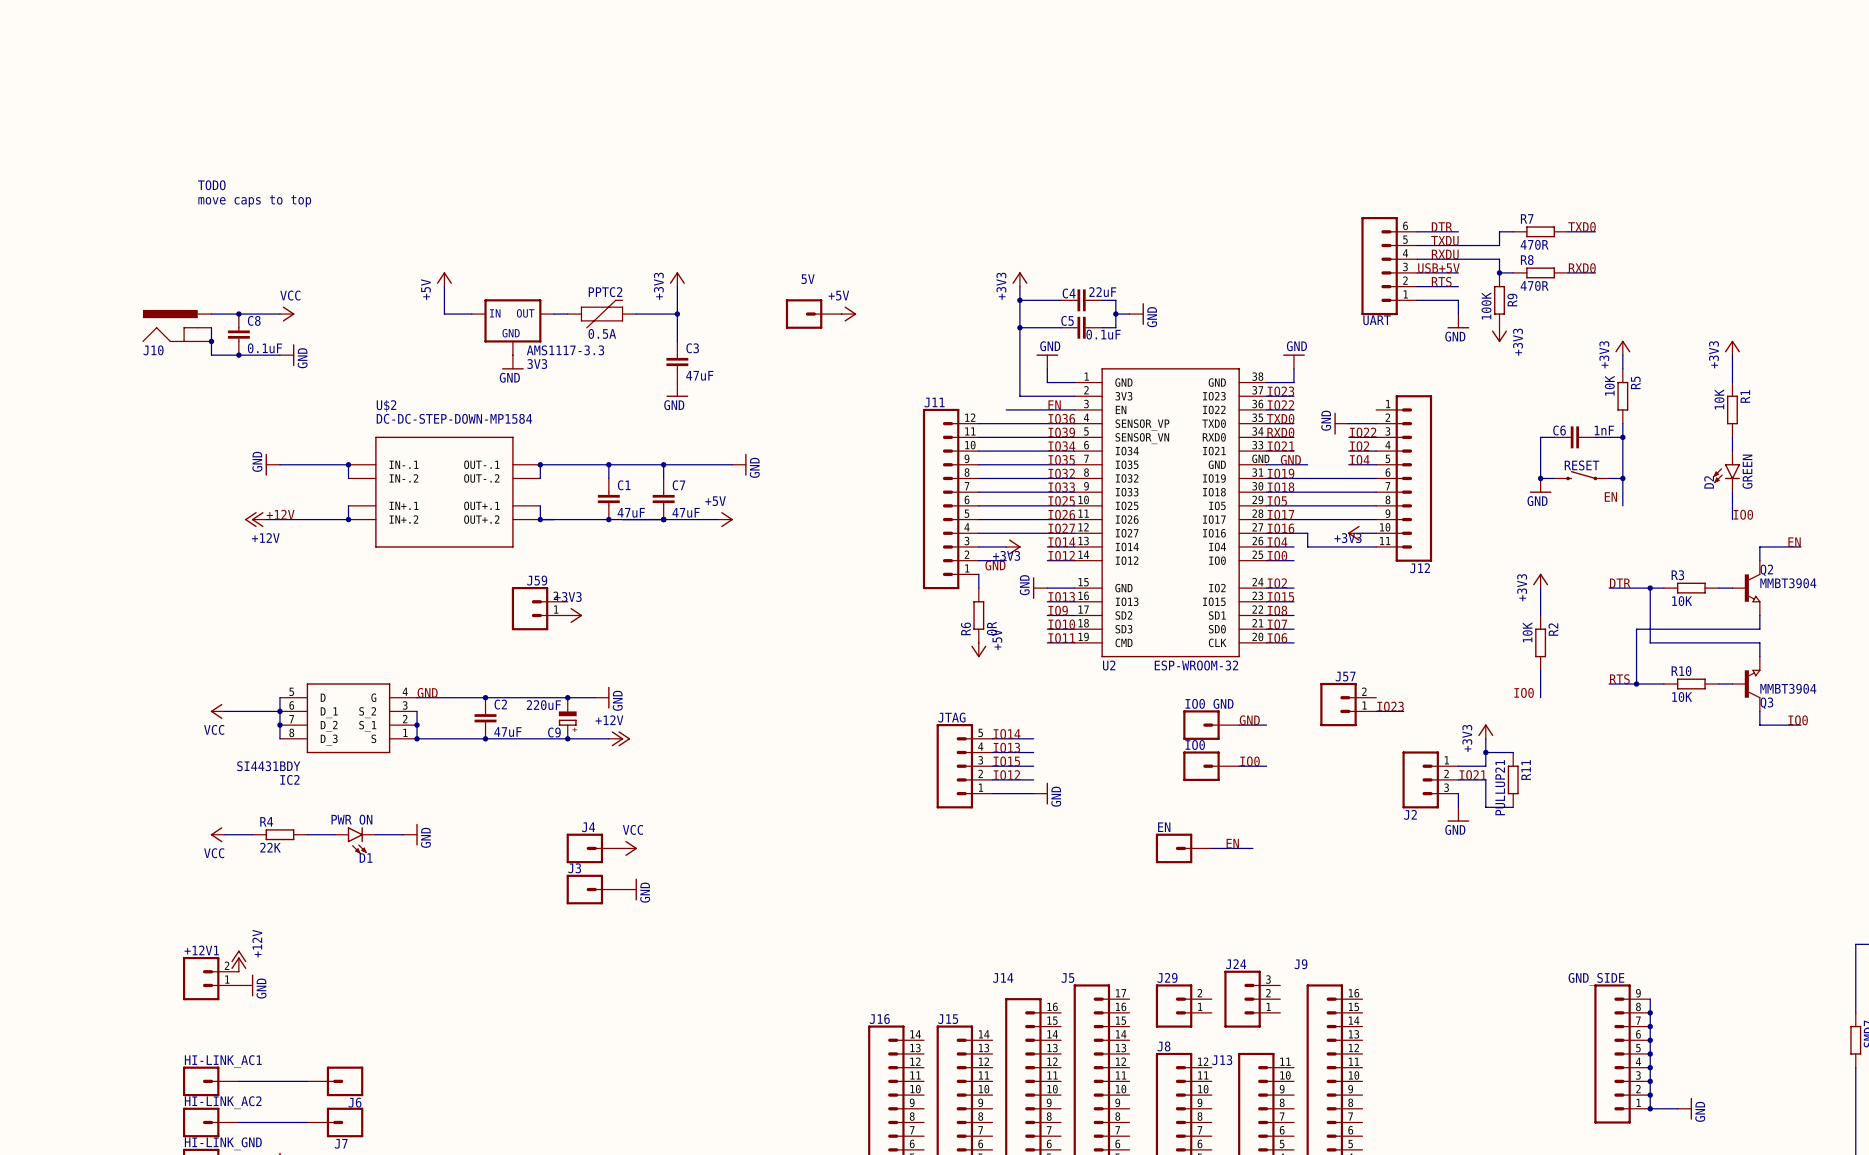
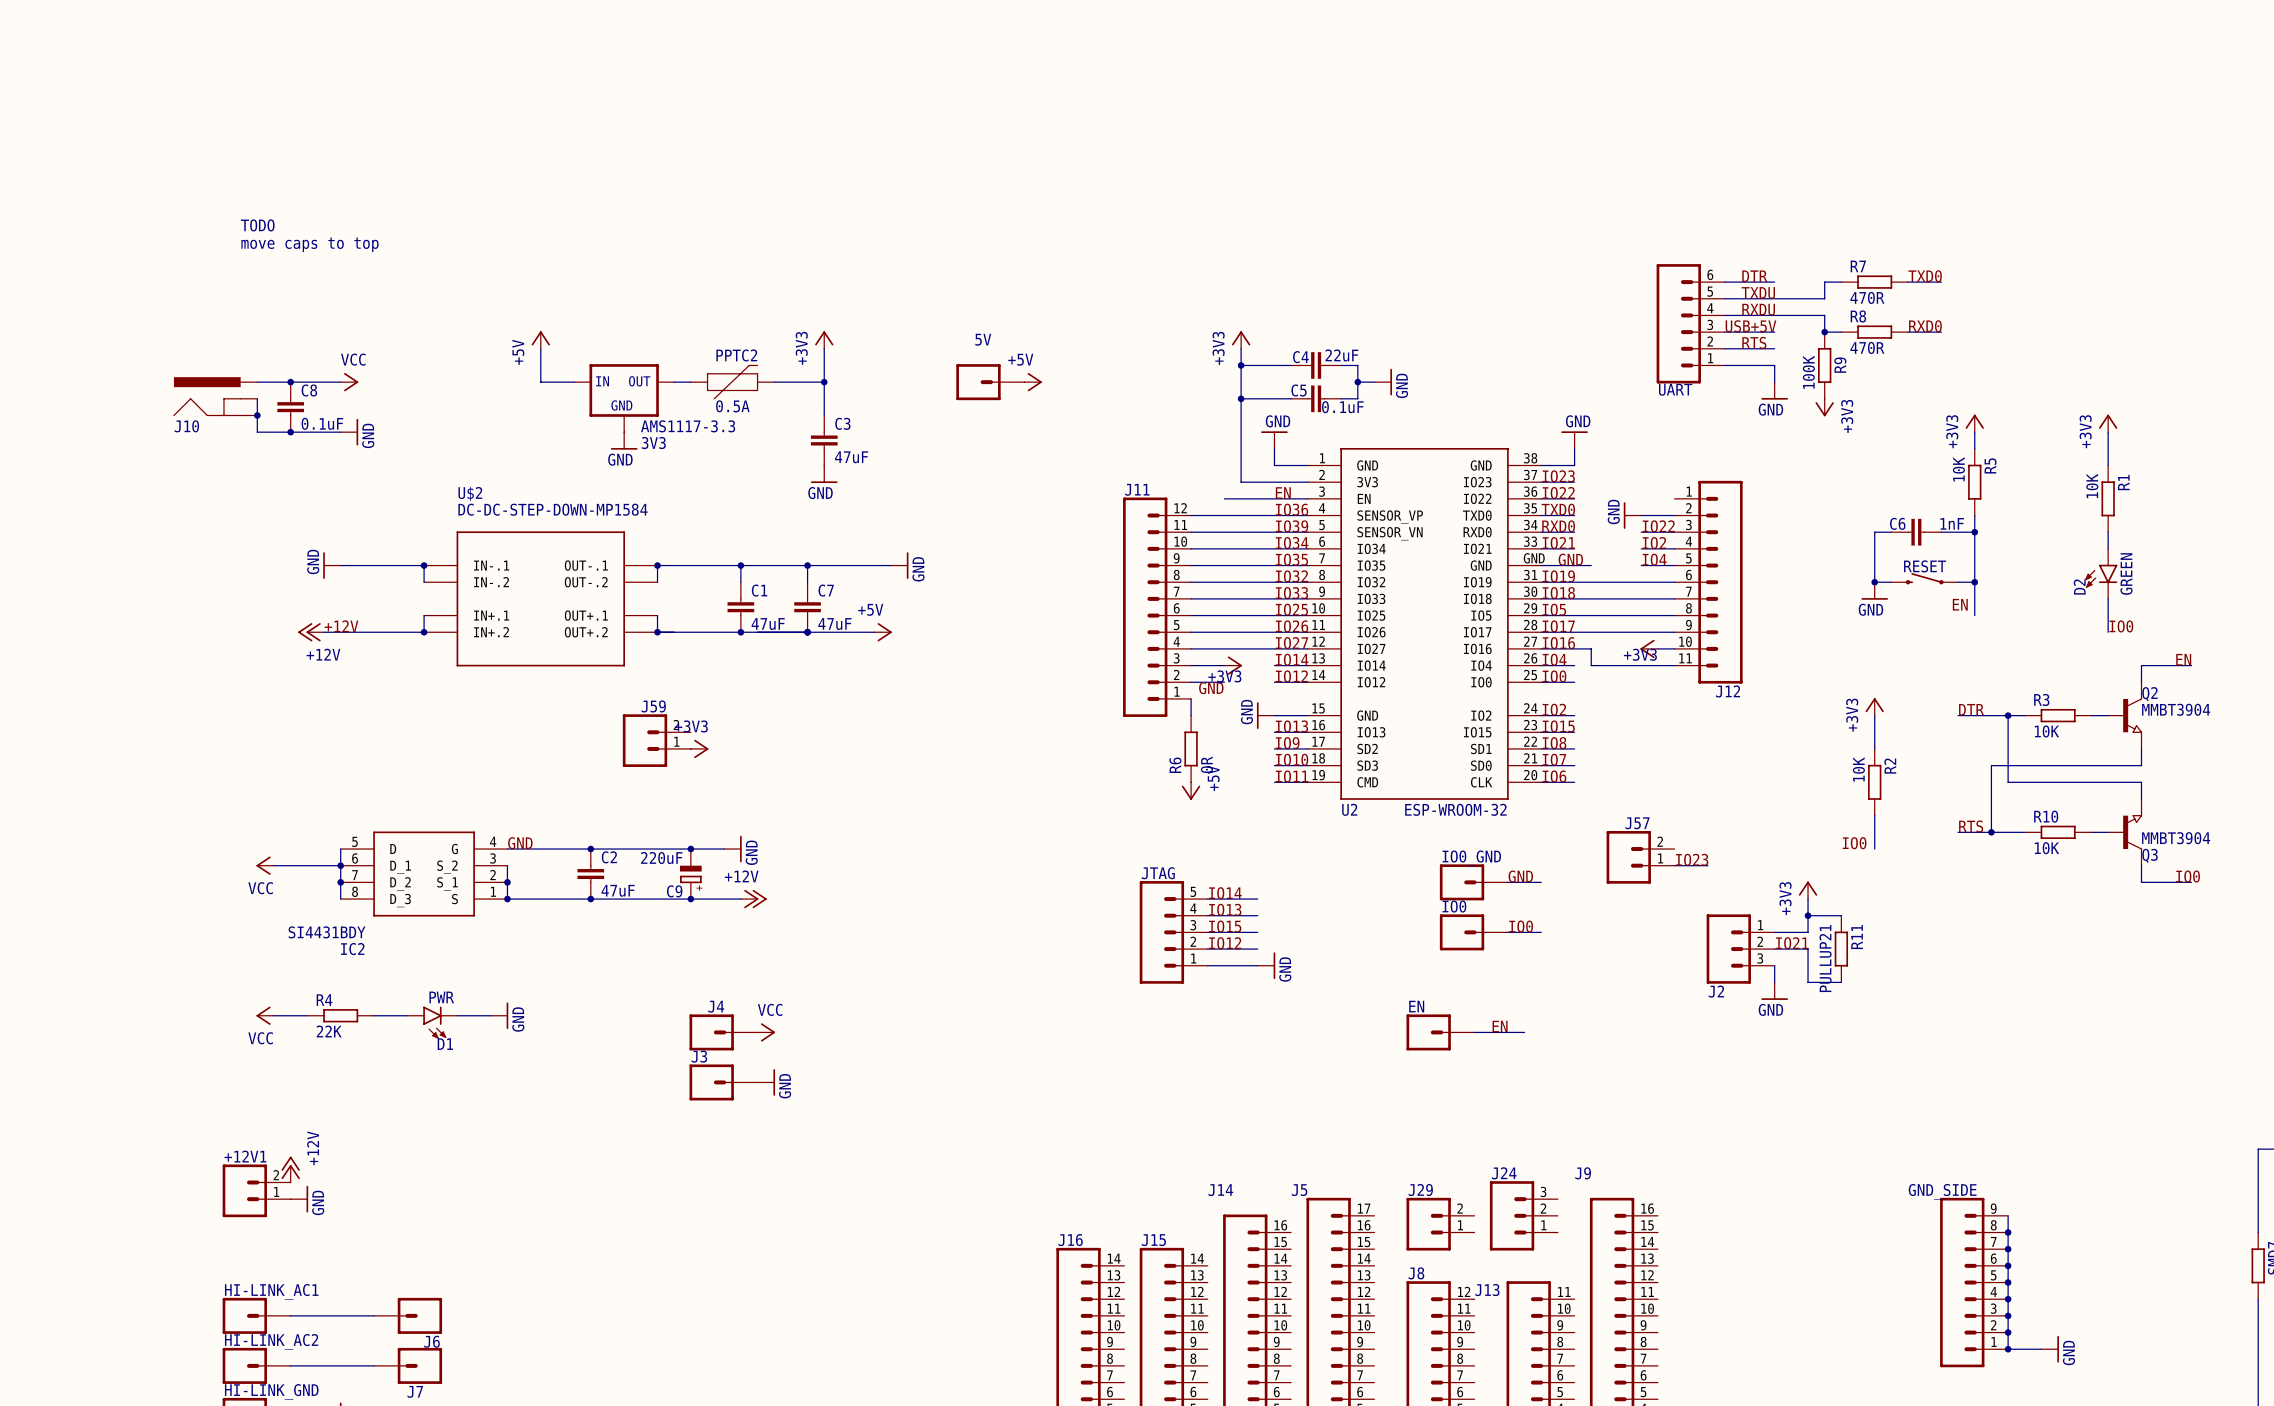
D1 value: PWR ON (351, 819) -> PWR (441, 997)

